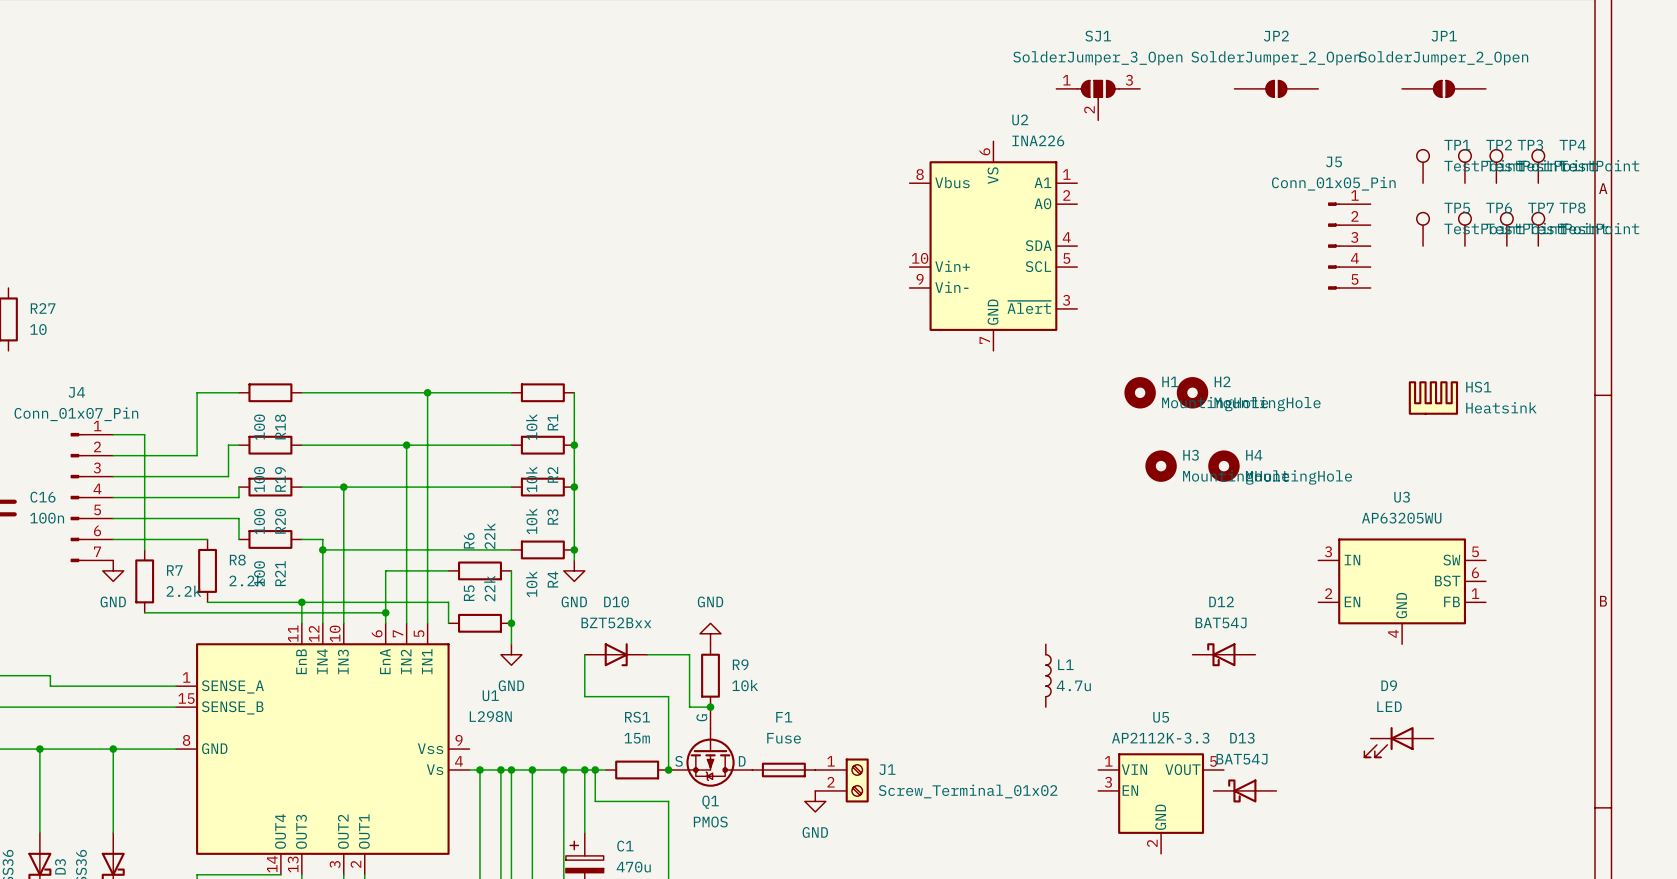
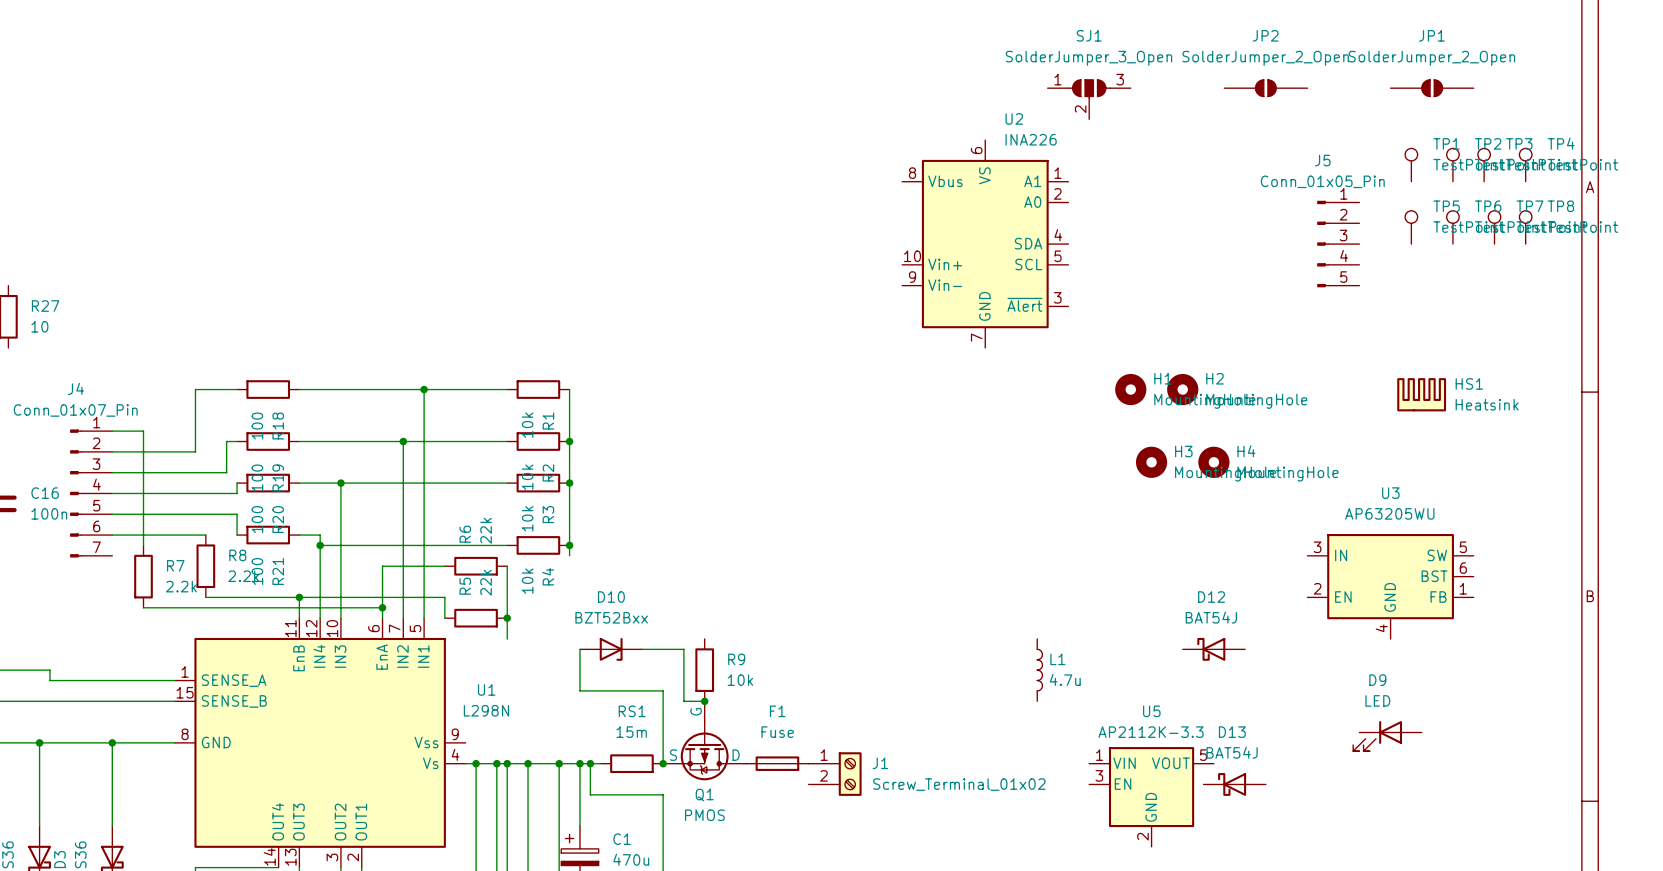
power symbol: GND (113, 570) -> none
power symbol: GND (574, 570) -> none
power symbol: GND (710, 633) -> none
power symbol: GND (511, 654) -> none
power symbol: GND (815, 801) -> none

